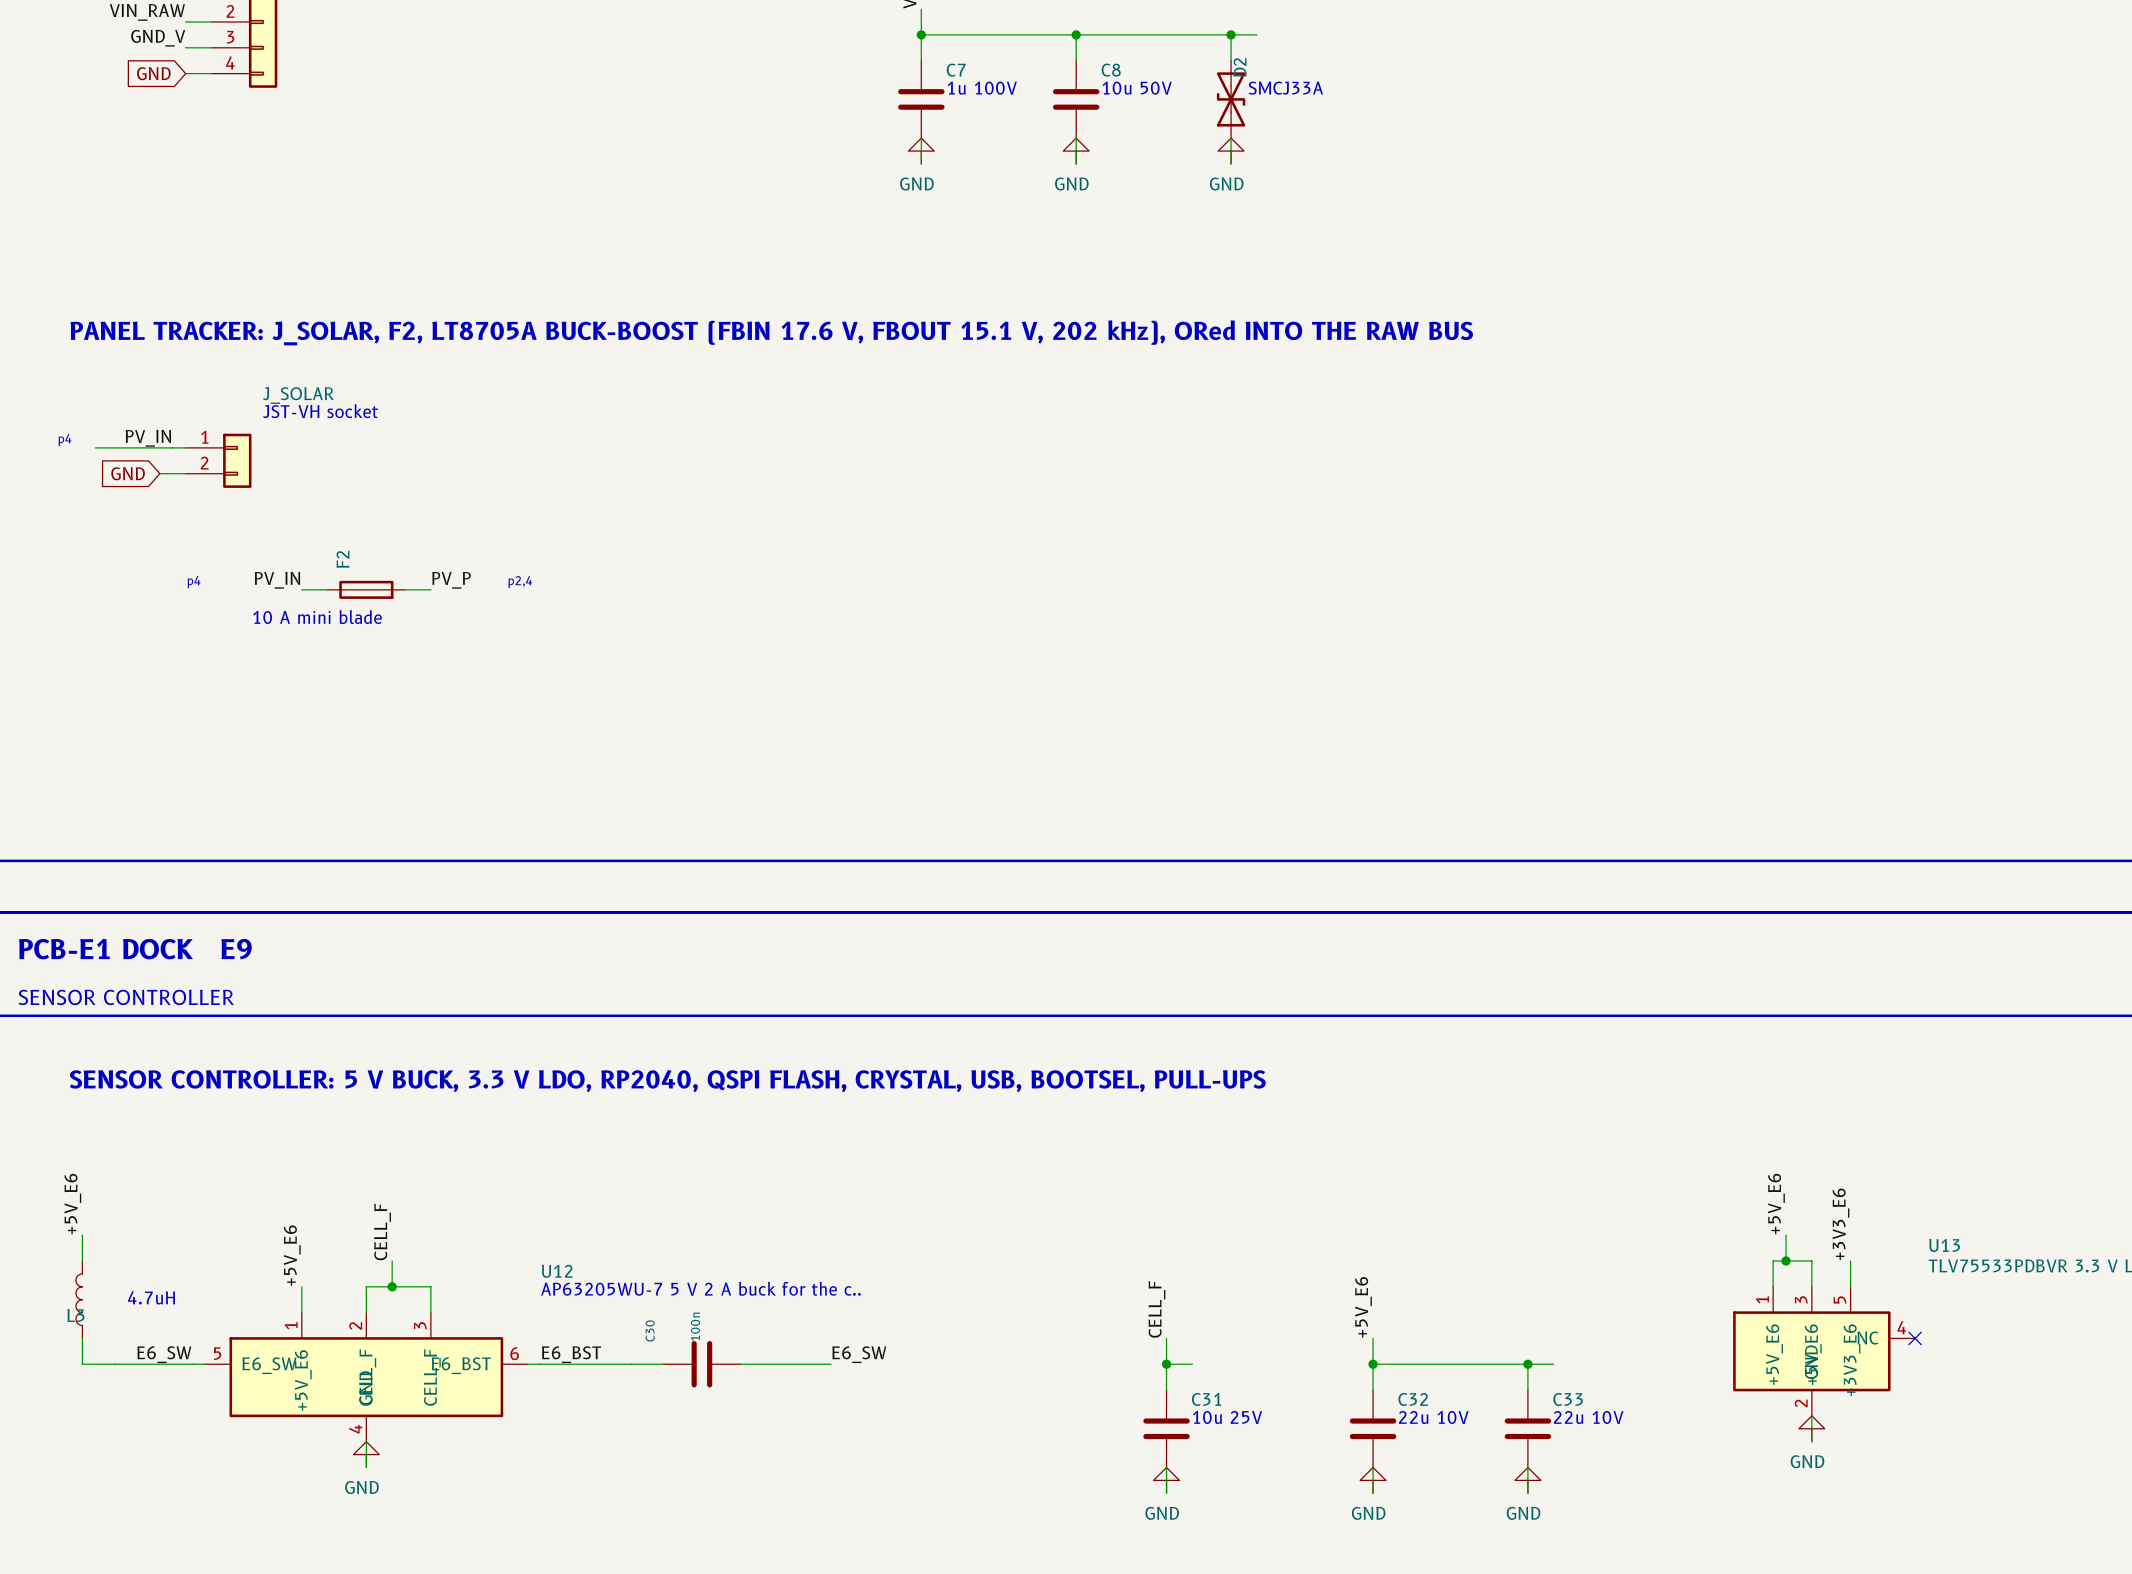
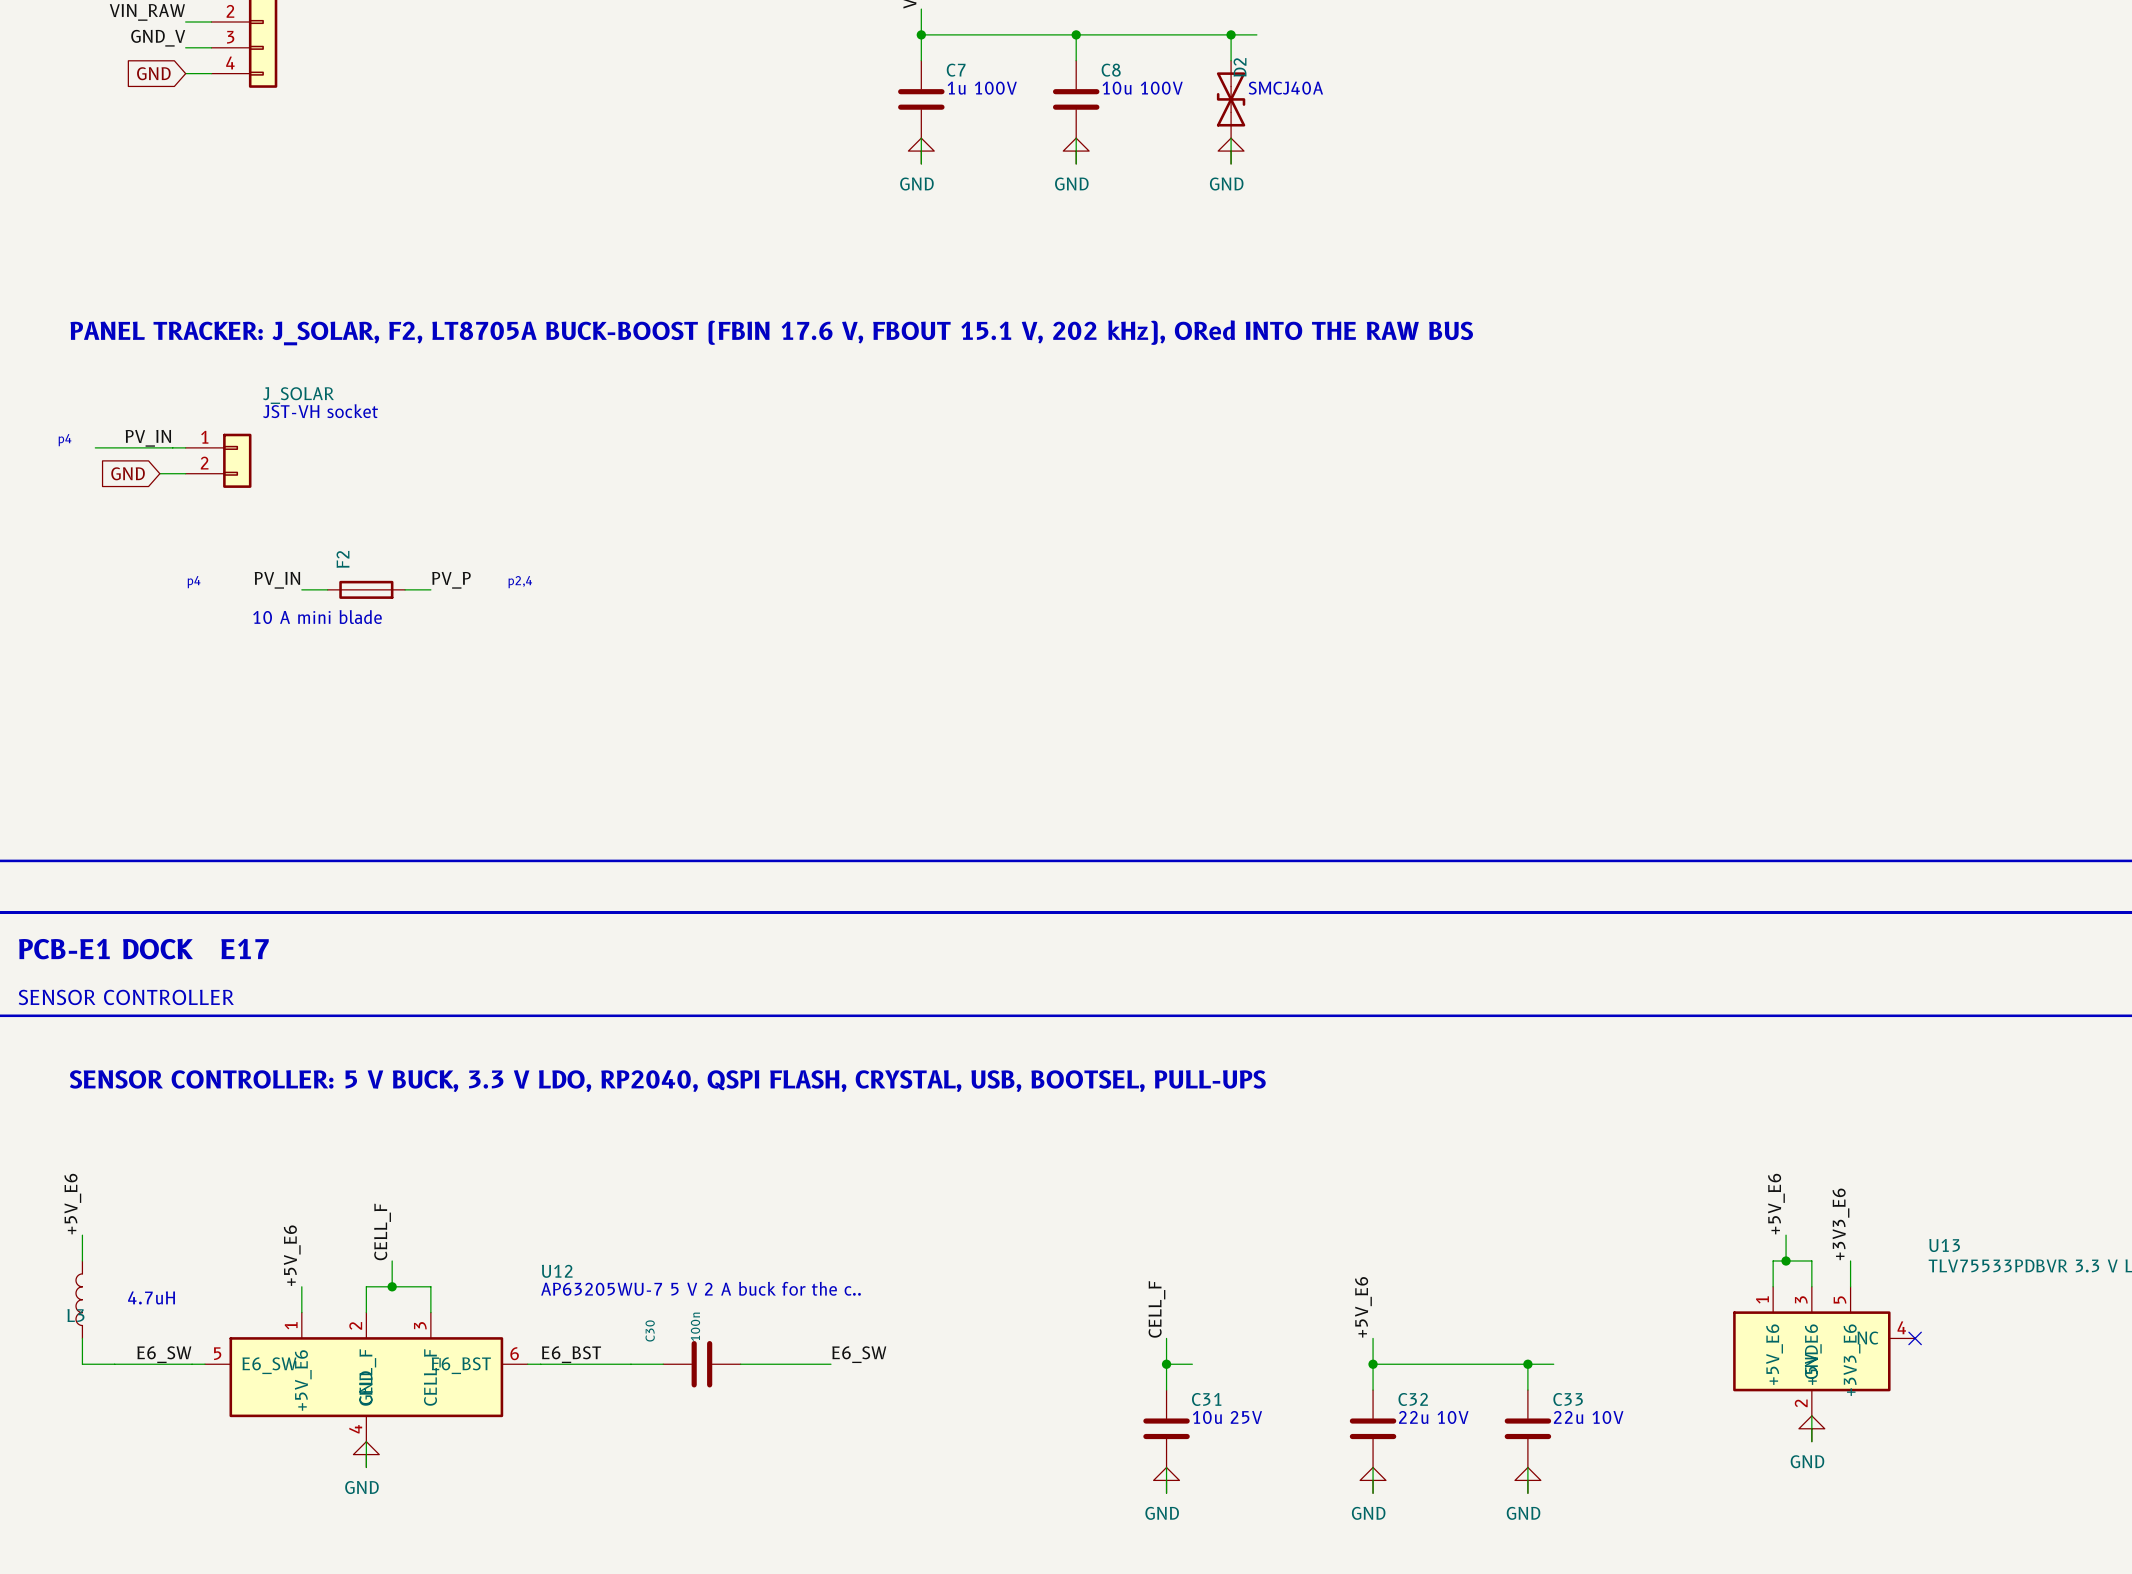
text: 10u 50V (1137, 88) -> 10u 100V (1142, 88)
text: SMCJ33A (1285, 88) -> SMCJ40A (1285, 88)
text: PCB-E1 DOCK E9 (135, 949) -> PCB-E1 DOCK E17 (143, 949)

